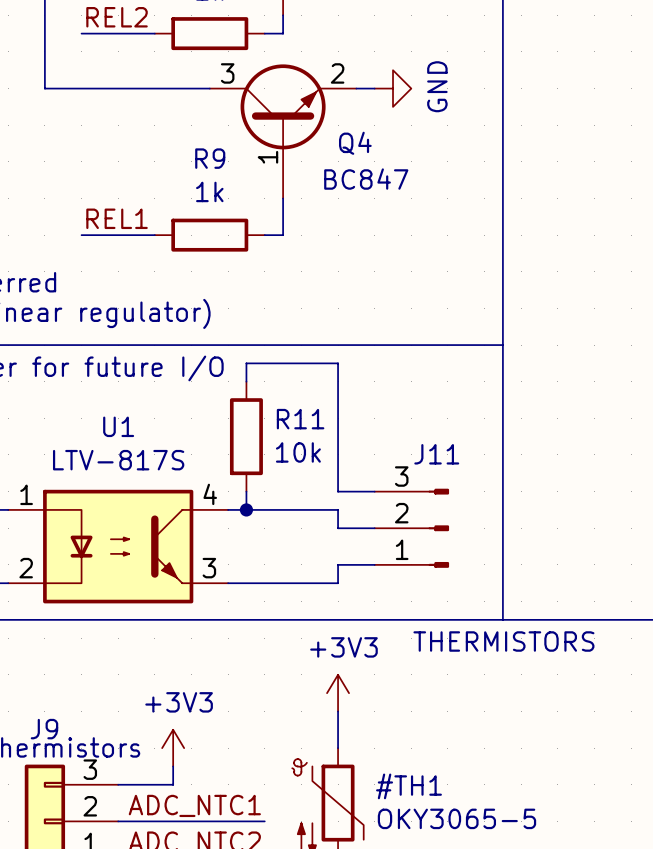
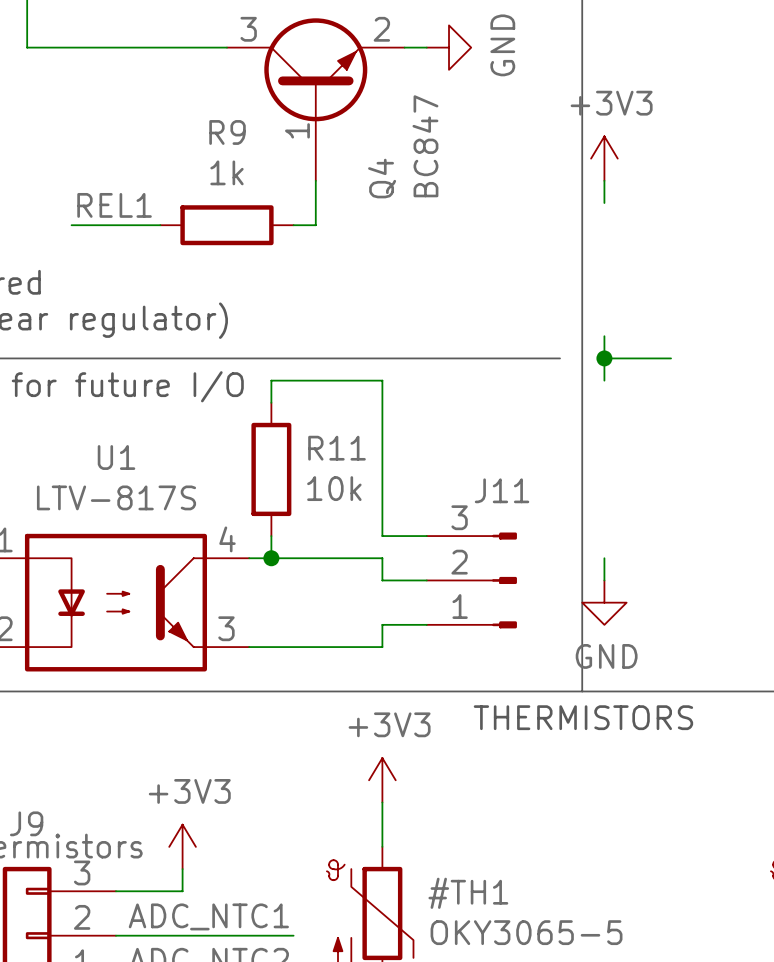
Q4 name rotation: 0° (355, 143) -> 90° counterclockwise (382, 178)
Q4 name position: Q4 (355, 143) -> Q4 (382, 178)
Q4 value rotation: 0° (366, 179) -> 90° counterclockwise (425, 146)
power symbol: none -> +3V3 (604, 158)
wire: none -> (604, 180) (604, 203)
wire: none -> (604, 336) (604, 380)
line: (484, 345) (502, 345) -> none
wire: none -> (604, 358) (671, 358)
junction: none -> (604, 358)
wire: none -> (604, 558) (604, 580)
power symbol: none -> GND (604, 602)

